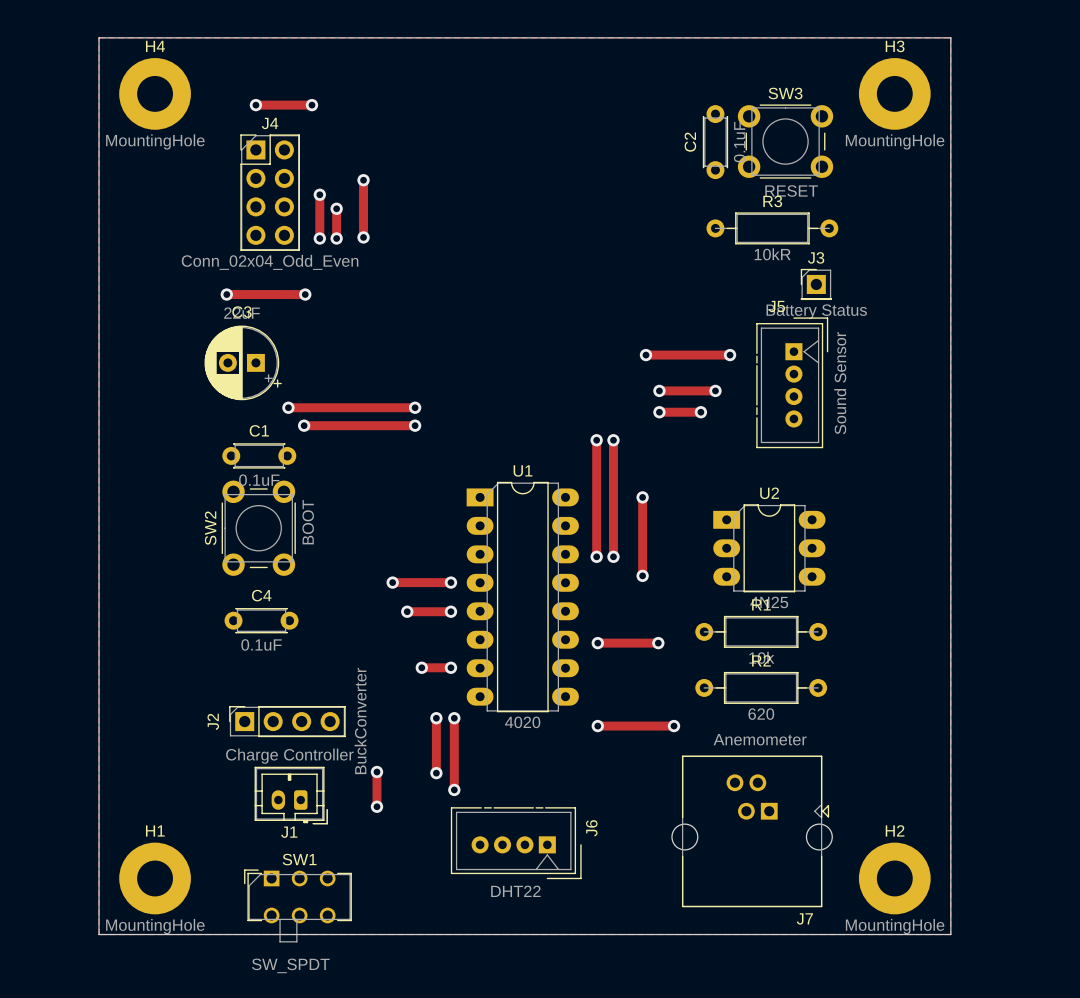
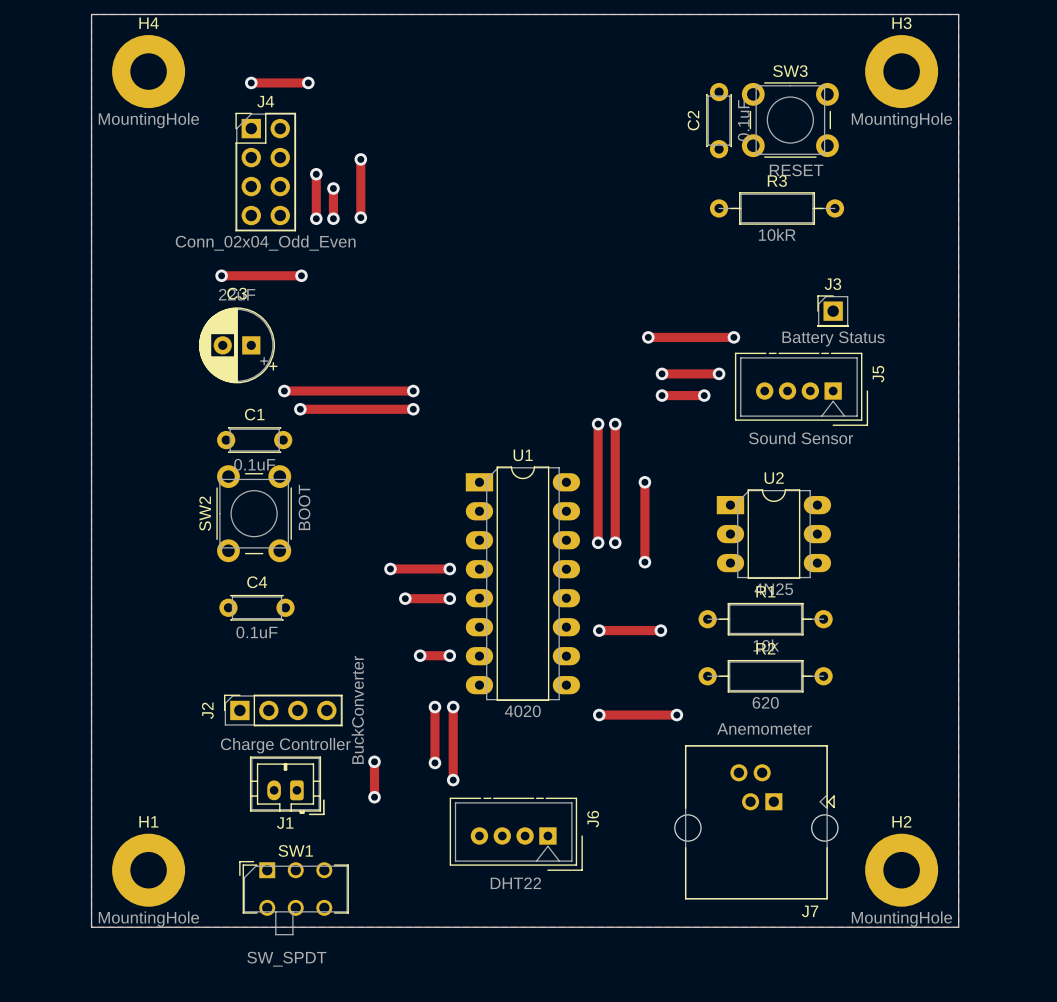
J3 position: (816, 284) -> (833, 311)
J5 rotation: 0° (792, 382) -> 90° clockwise (801, 389)

